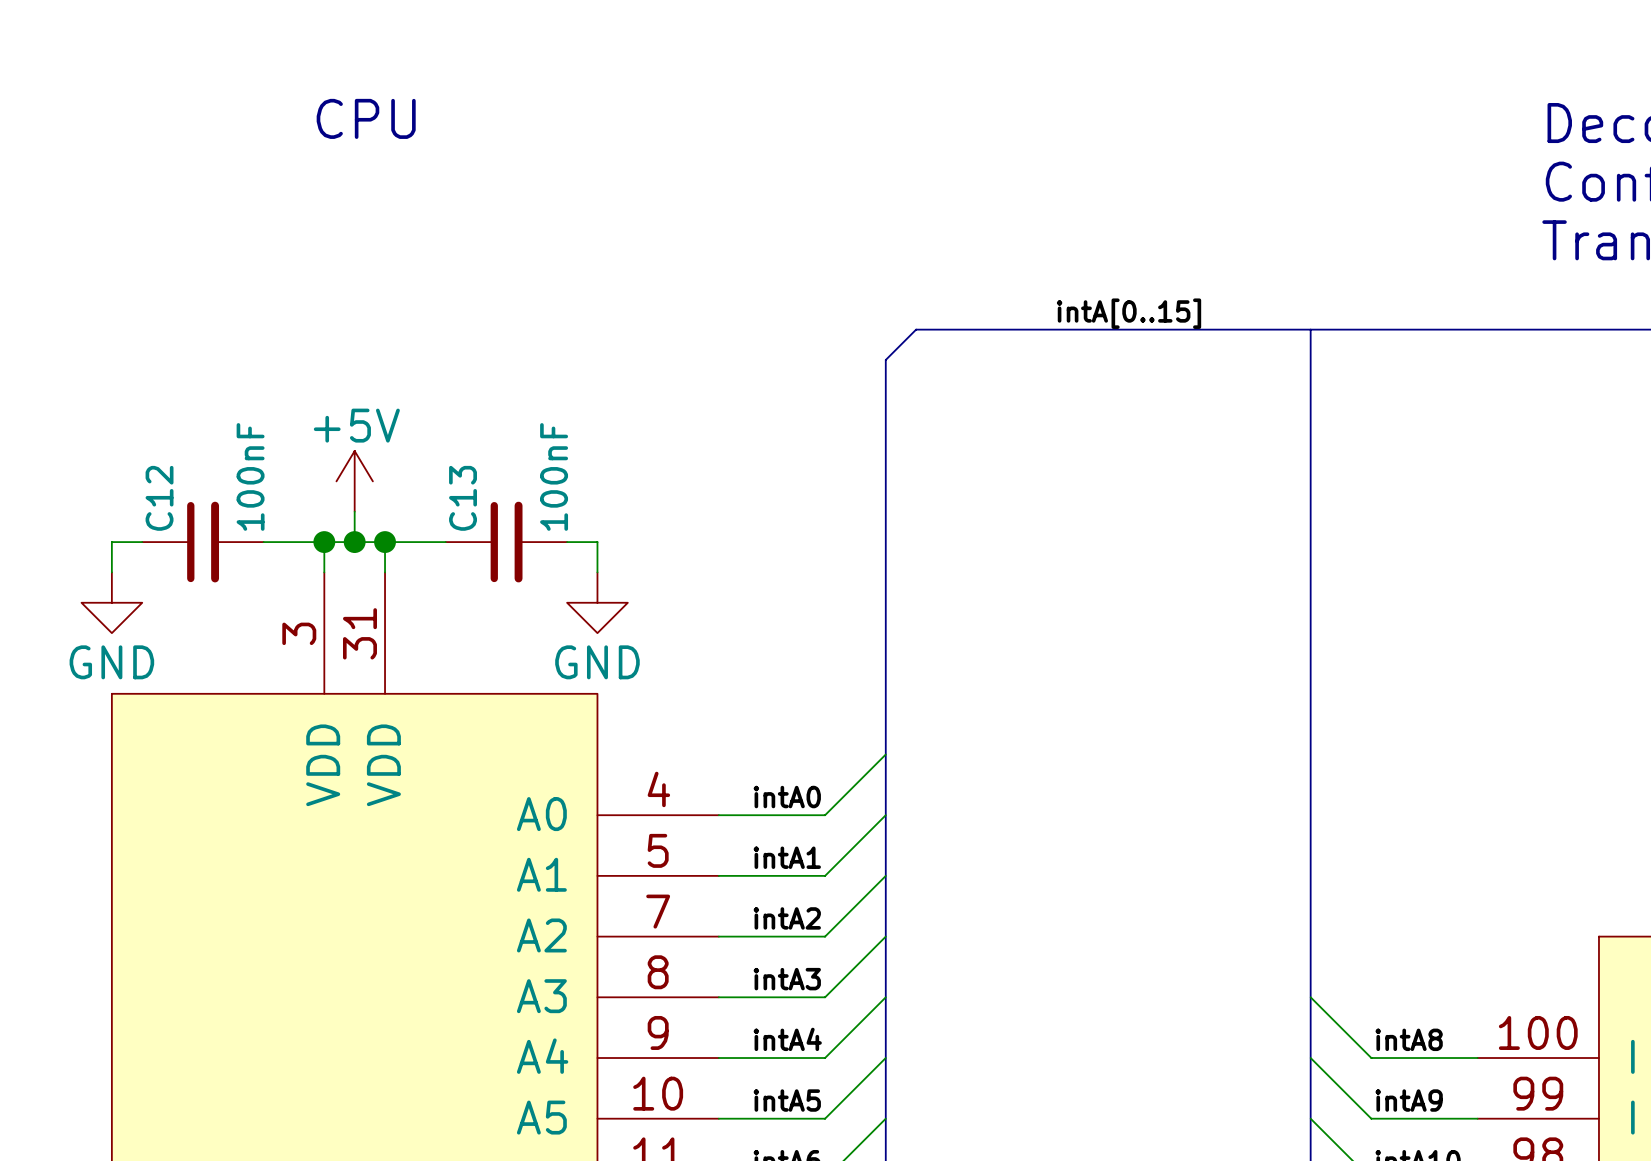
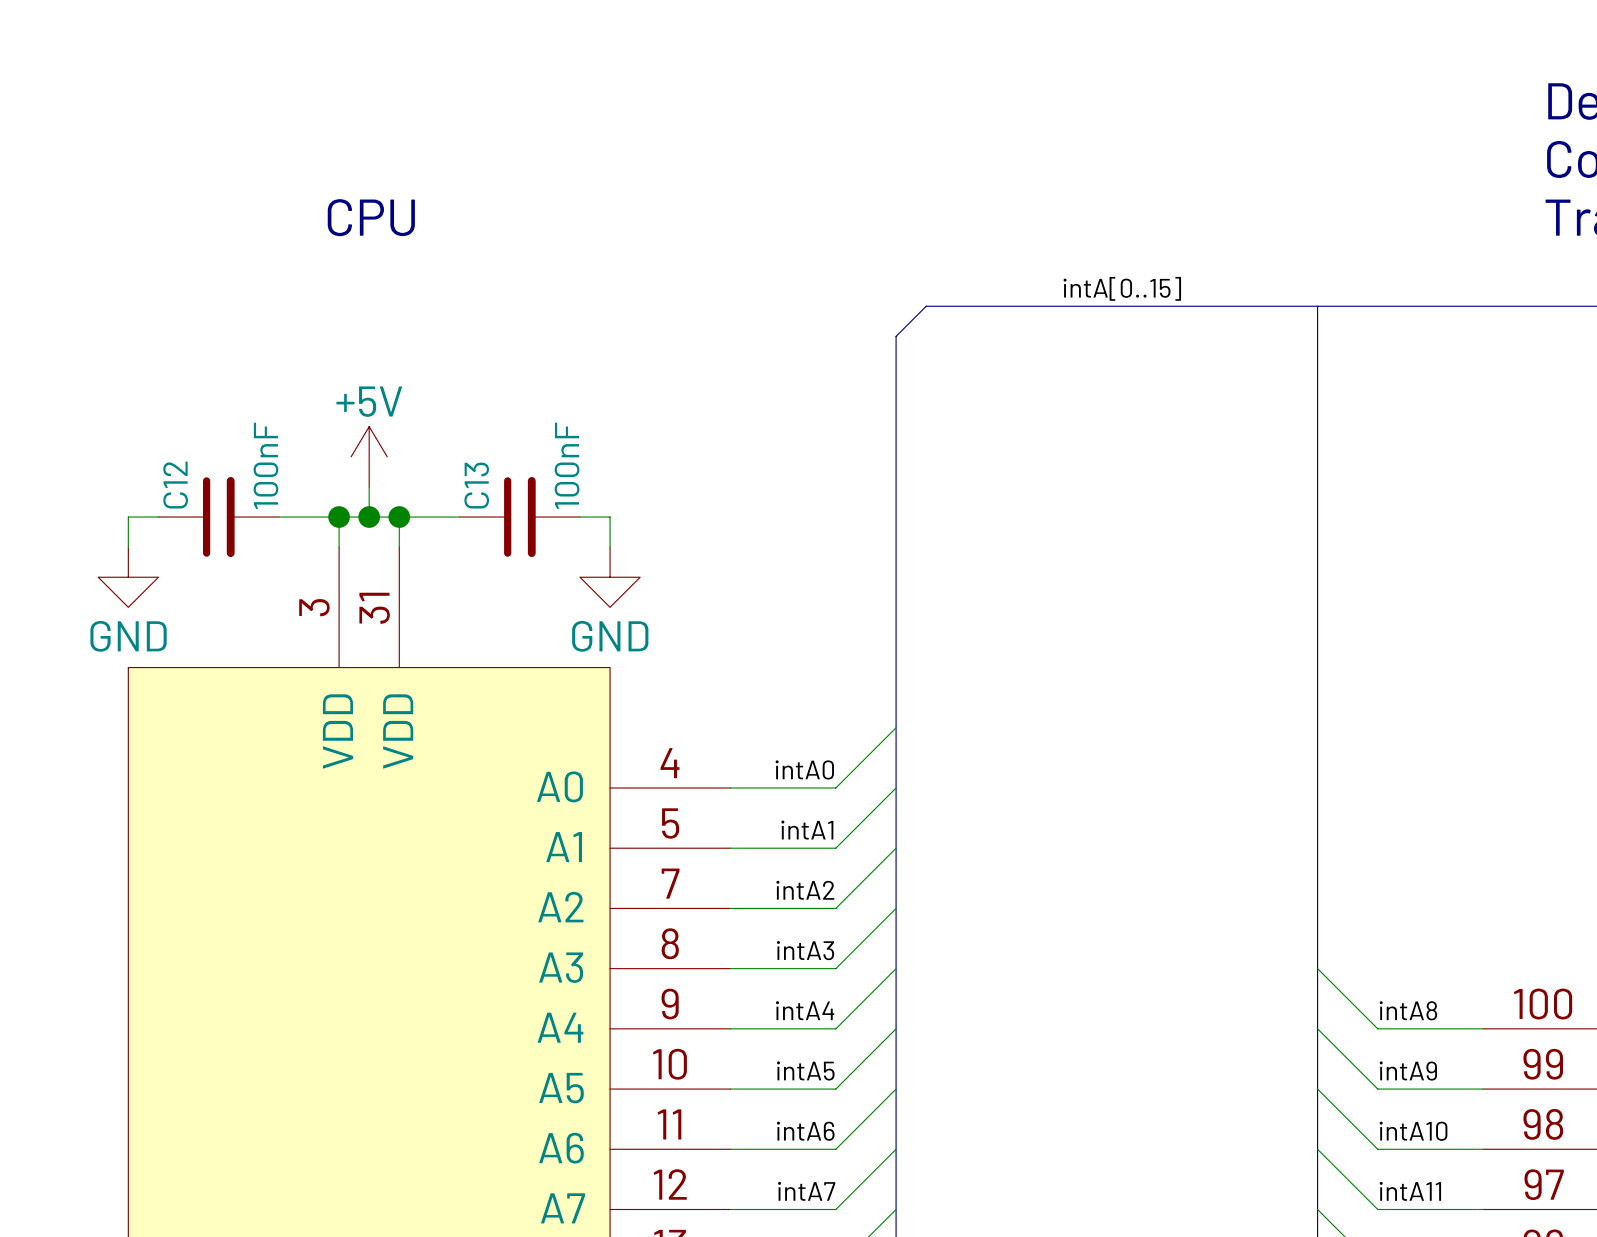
text position: CPU (366, 118) -> CPU (371, 217)

